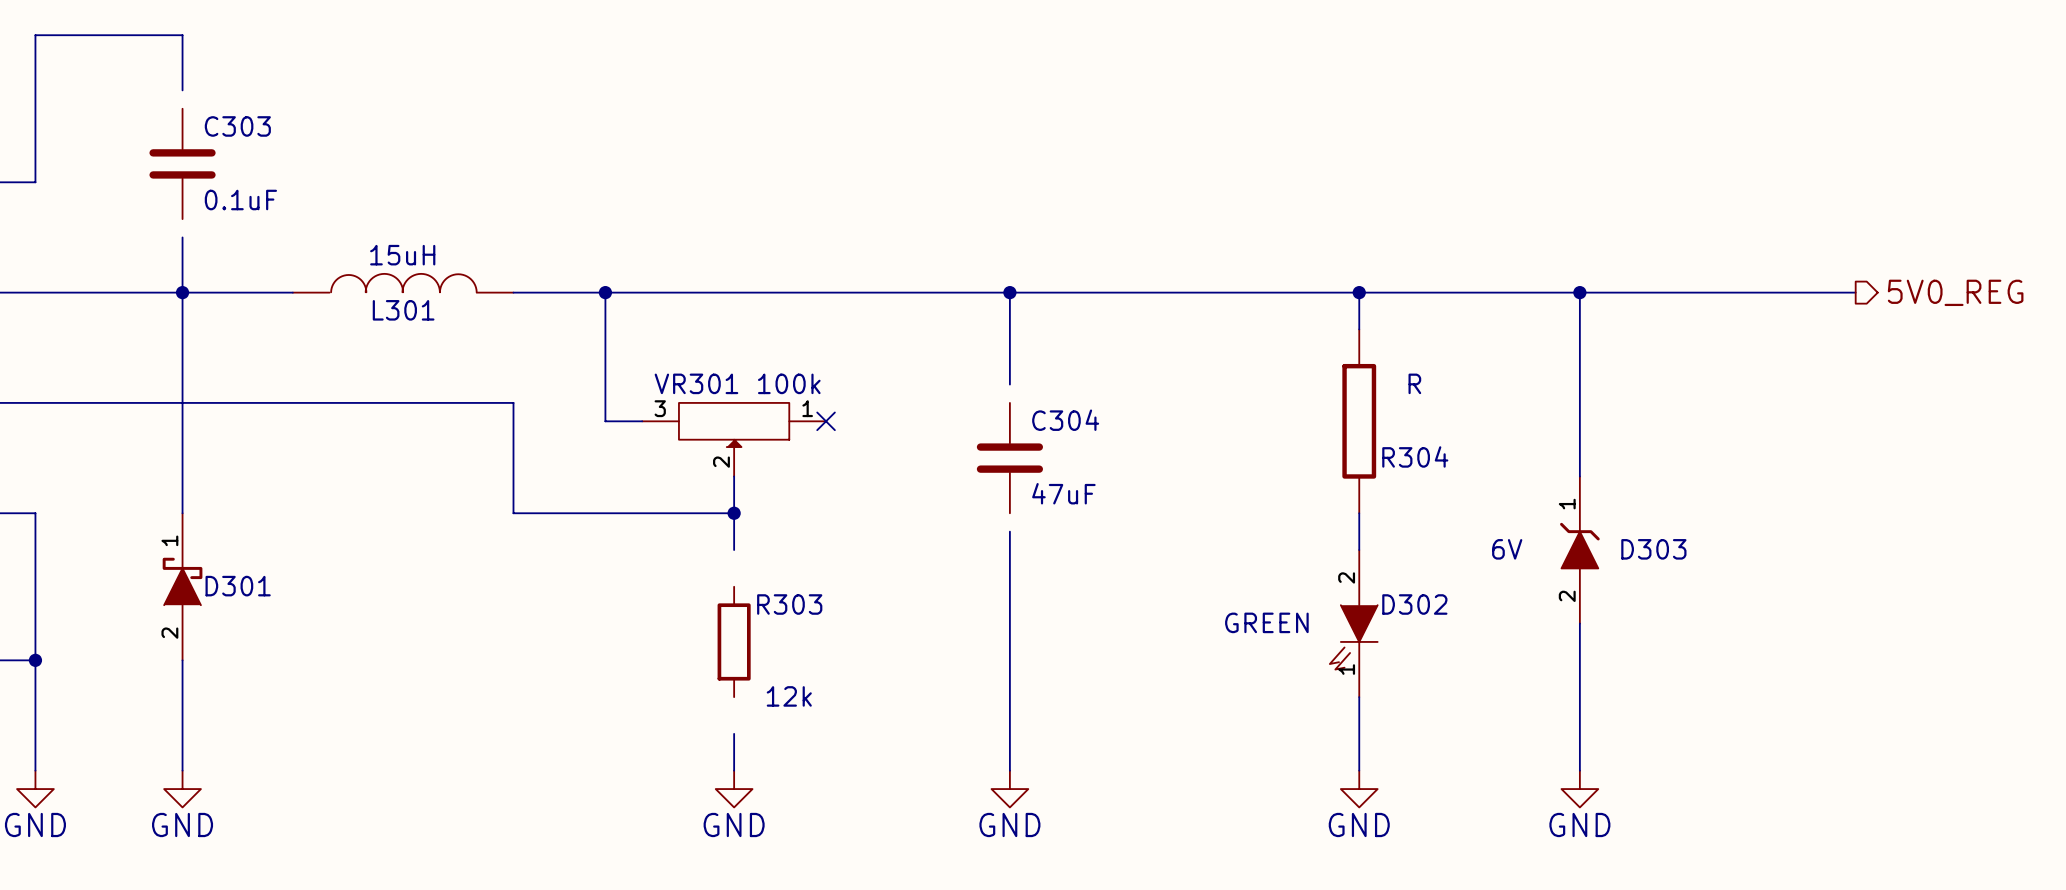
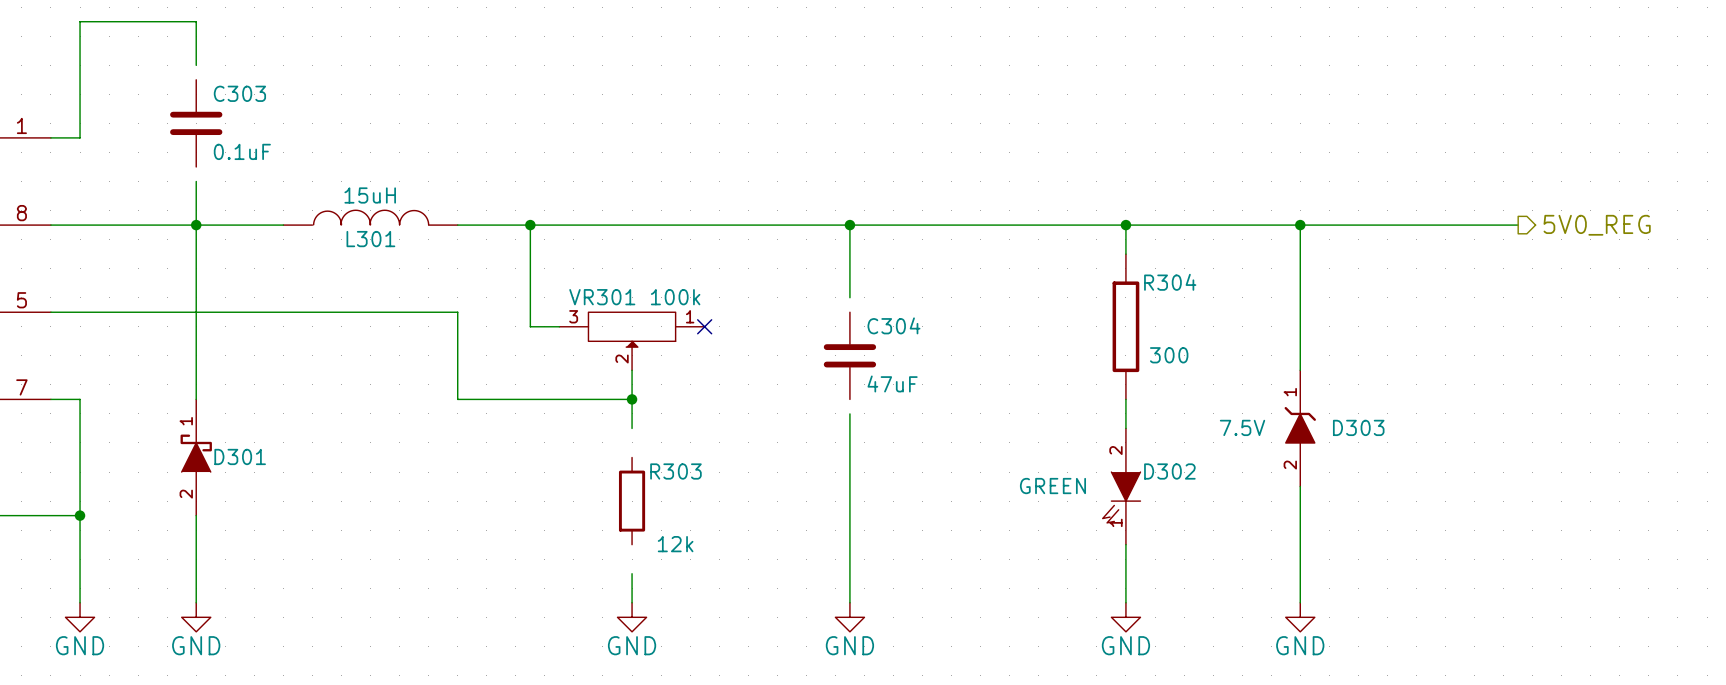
R304 value: R (1414, 383) -> 300 (1169, 355)
R304 name position: R304 (1415, 456) -> R304 (1170, 282)
D303 value: 6V (1507, 549) -> 7.5V (1242, 427)

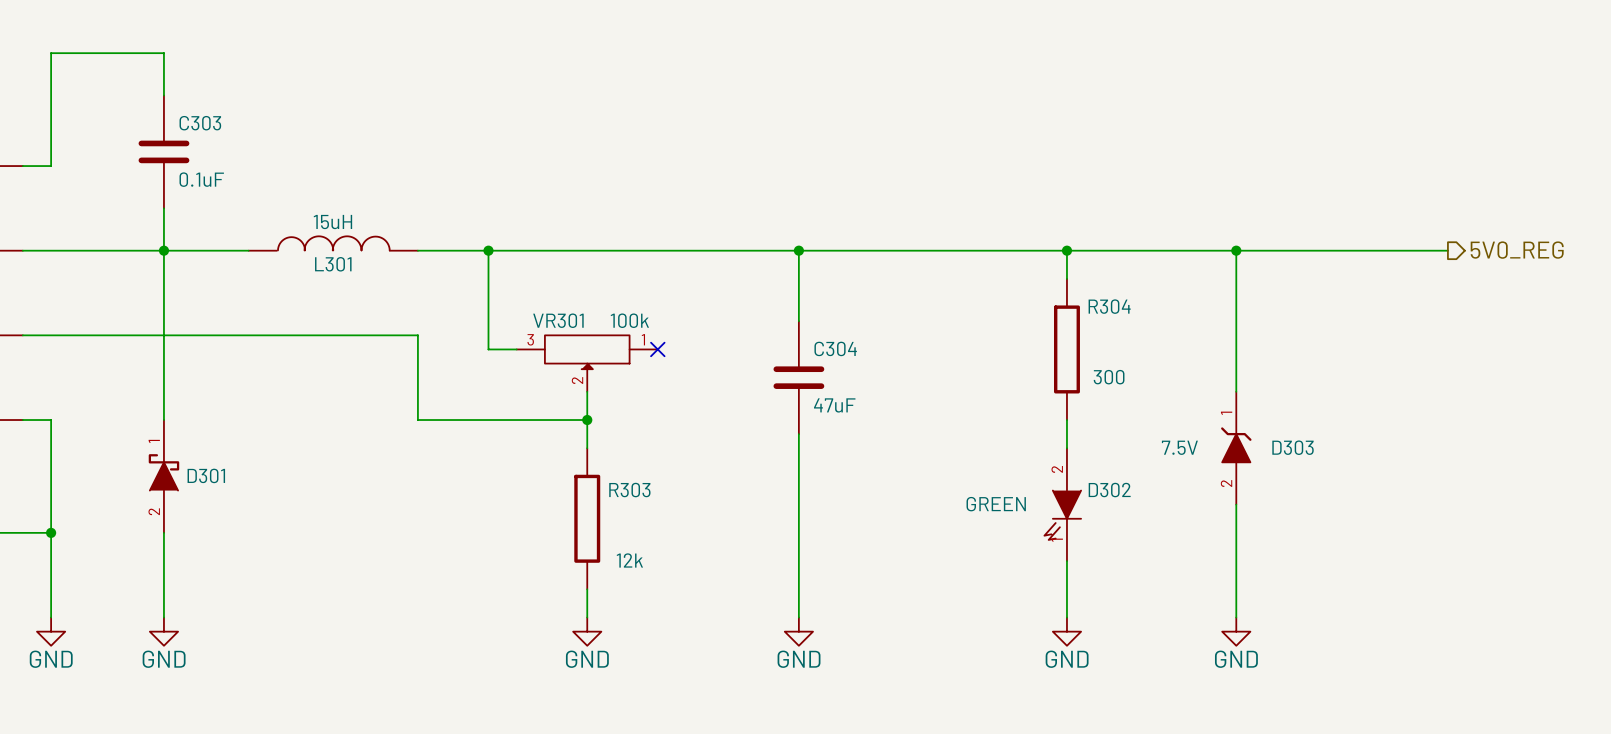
C303 symbol: [170, 79, 223, 167] -> [138, 95, 190, 209]
C304 symbol: [823, 312, 877, 400] -> [773, 321, 825, 435]
R303 symbol: [618, 457, 646, 545] -> [574, 448, 601, 590]

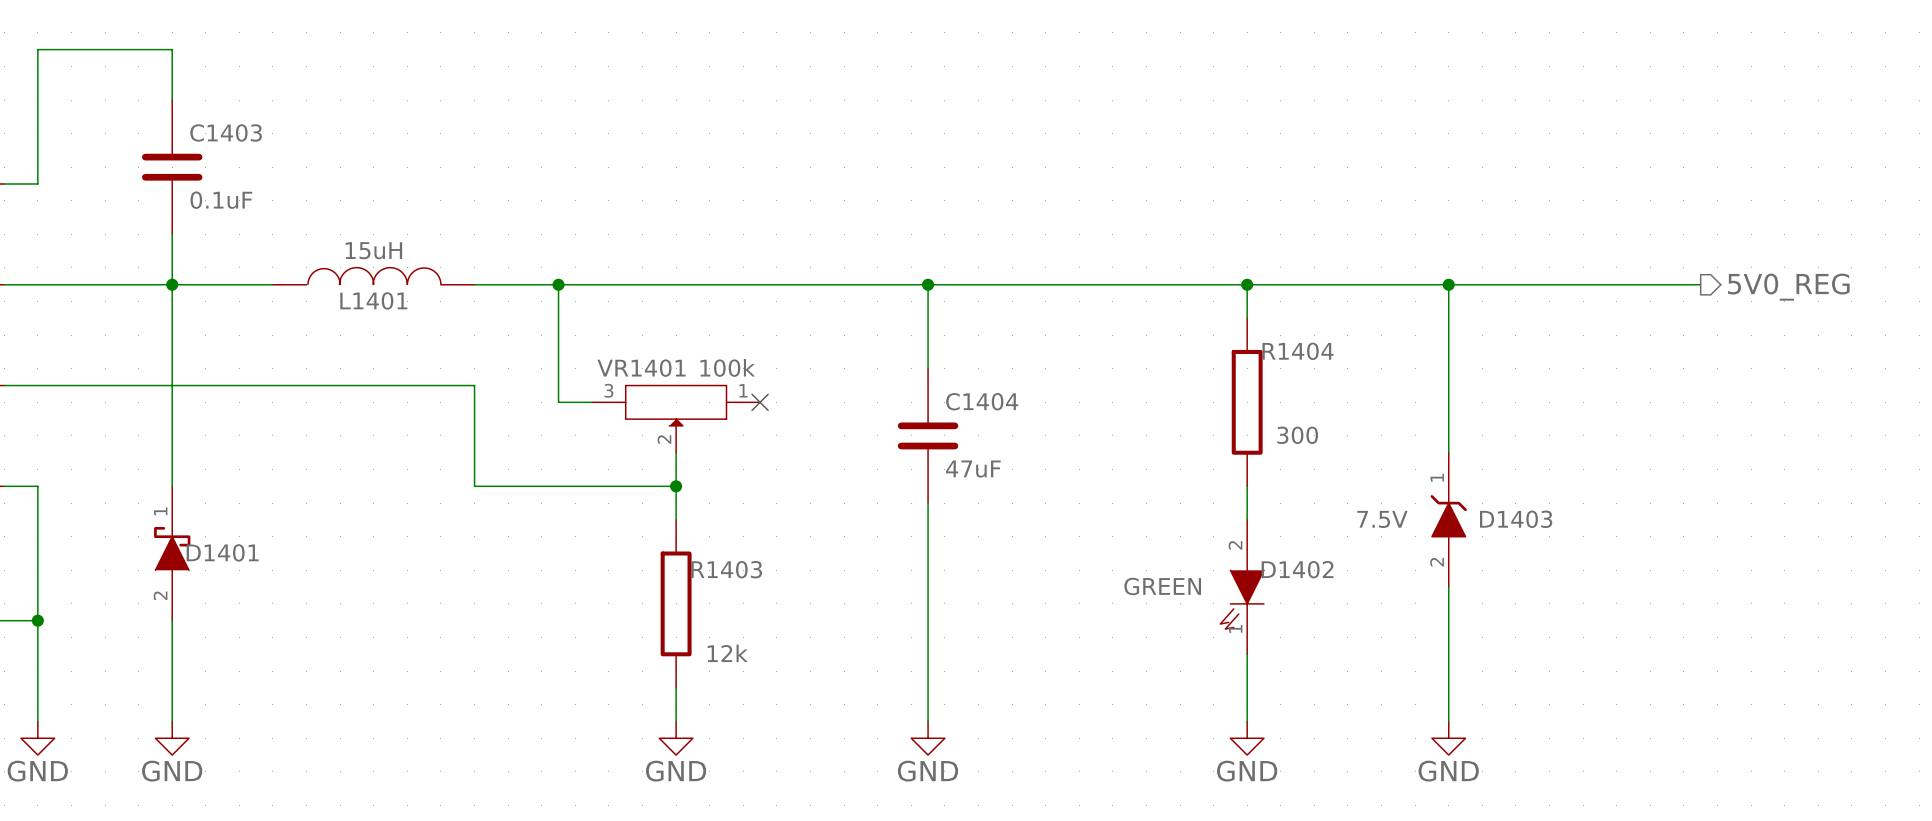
C303 name: C303 (200, 123) -> C1403 (226, 132)
L301 name: L301 (333, 264) -> L1401 (373, 300)
R304 name: R304 (1109, 306) -> R1404 (1298, 351)
VR301 name: VR301 (558, 320) -> VR1401 (641, 368)
C304 name: C304 (835, 348) -> C1404 (982, 401)
D303 name: D303 (1293, 447) -> D1403 (1516, 519)
D301 name: D301 (206, 475) -> D1401 (222, 552)
R303 name: R303 (629, 490) -> R1403 (726, 569)
D302 name: D302 (1109, 490) -> D1402 (1297, 569)

